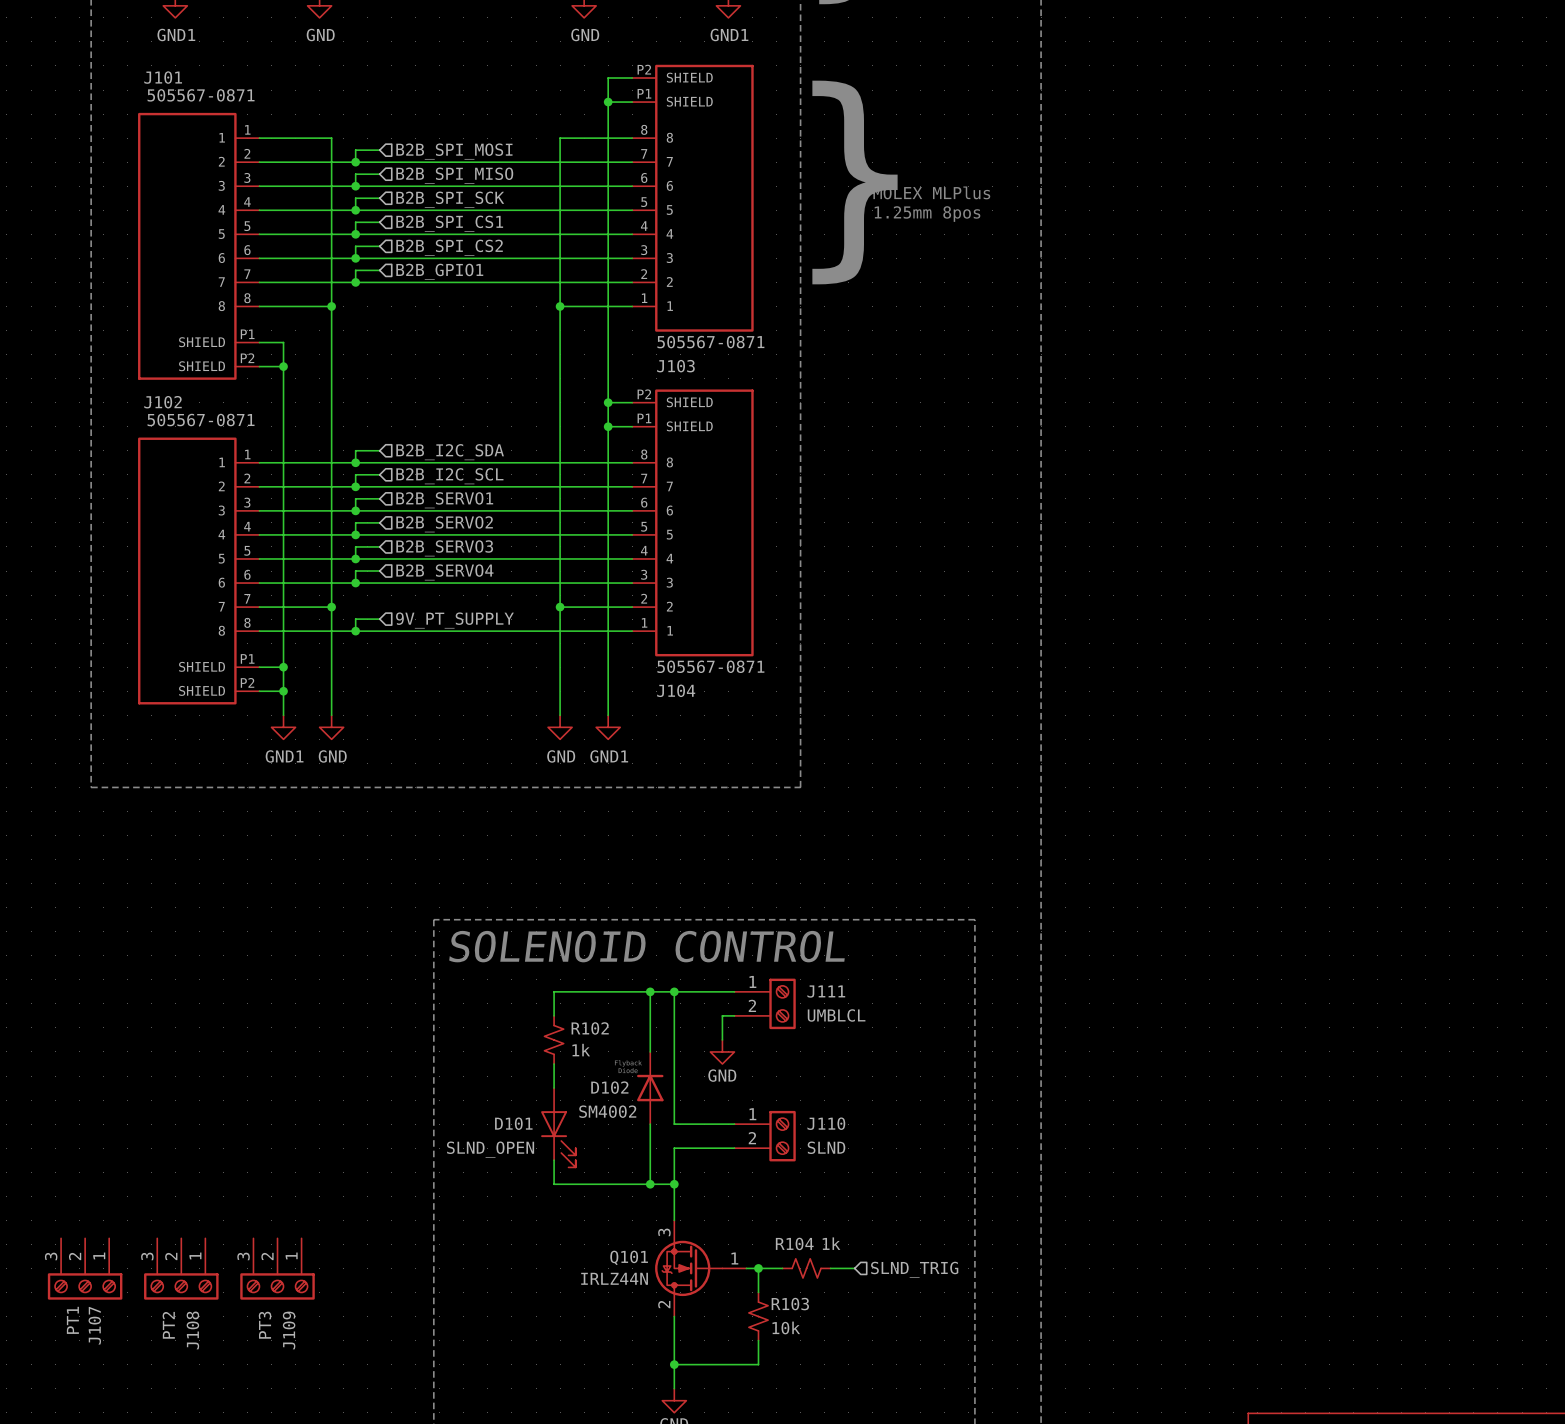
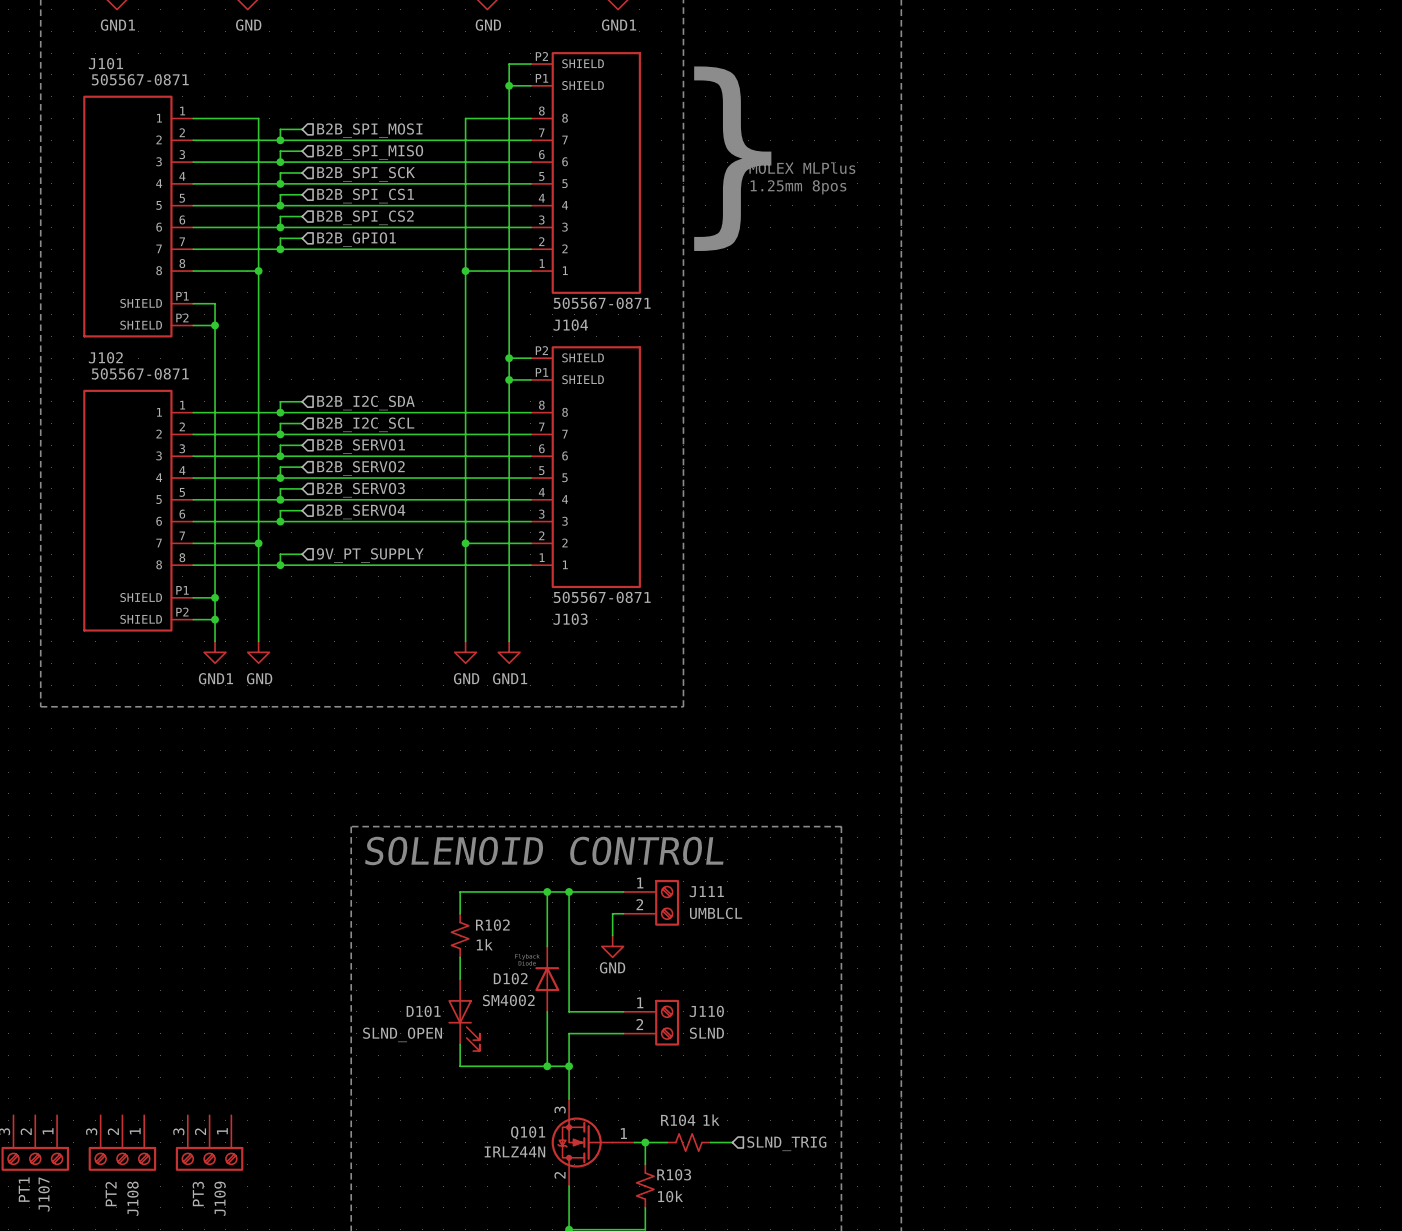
J103 name: J103 (675, 366) -> J104 (570, 325)
J104 name: J104 (676, 690) -> J103 (570, 619)

